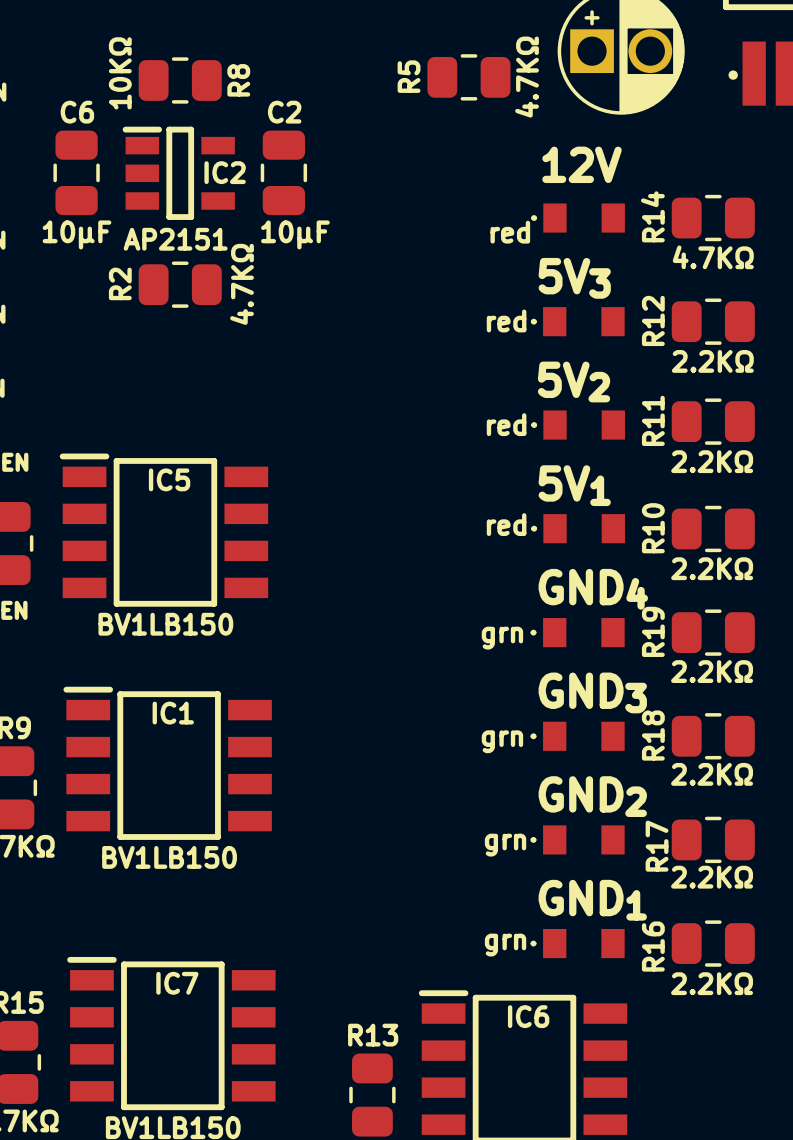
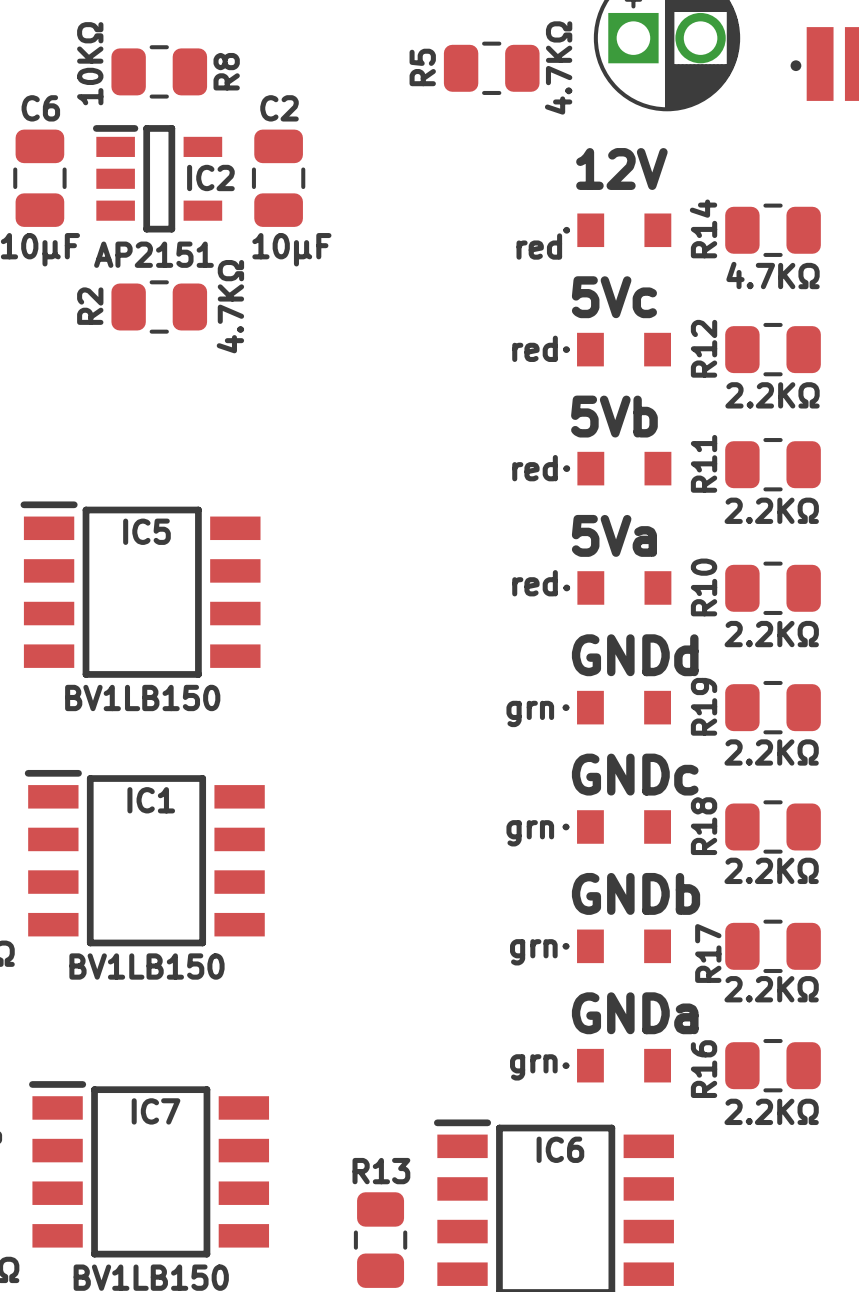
text: 5V3 (574, 278) -> 5Vc (614, 297)
text: 5V2 (574, 382) -> 5Vb (614, 416)
text: 5V1 (574, 485) -> 5Va (614, 535)
text: GND4 (593, 589) -> GNDd (635, 655)
text: GND3 (592, 692) -> GNDc (635, 774)
text: GND2 (592, 796) -> GNDb (636, 893)
text: GND1 (592, 900) -> GNDa (635, 1013)

